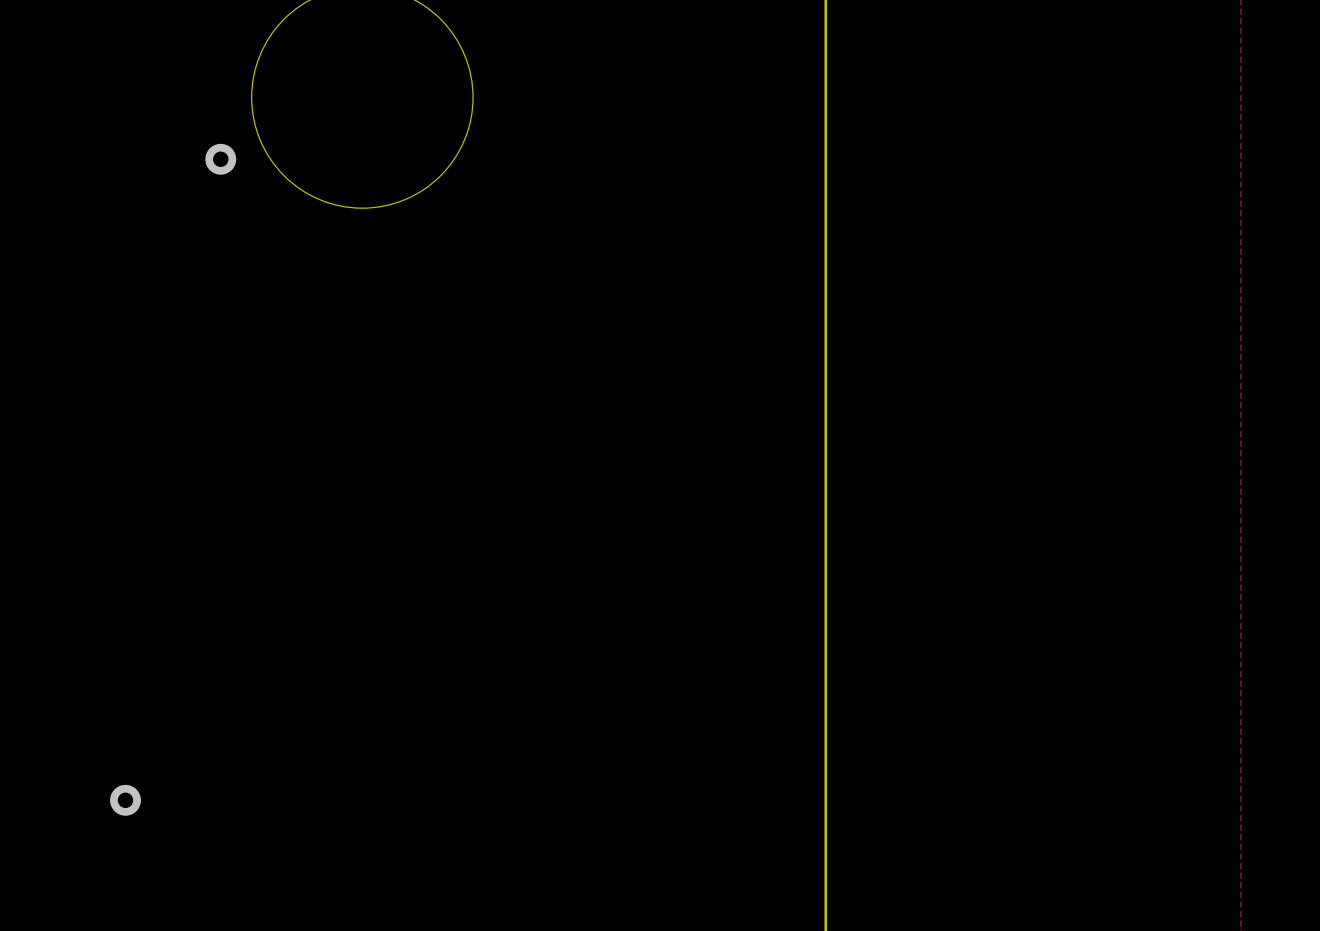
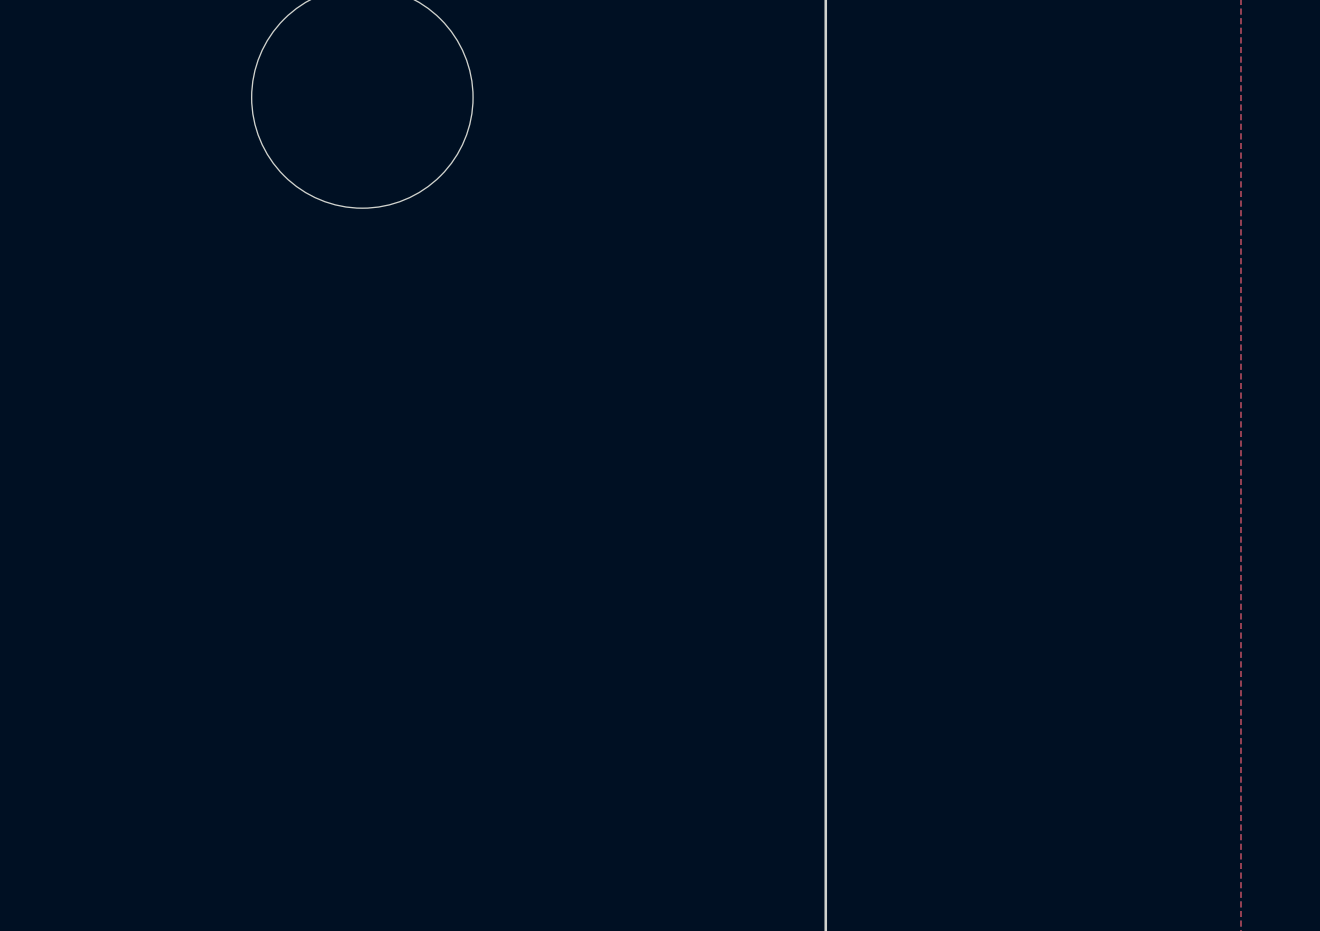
via: (220, 159) -> none
via: (125, 800) -> none

